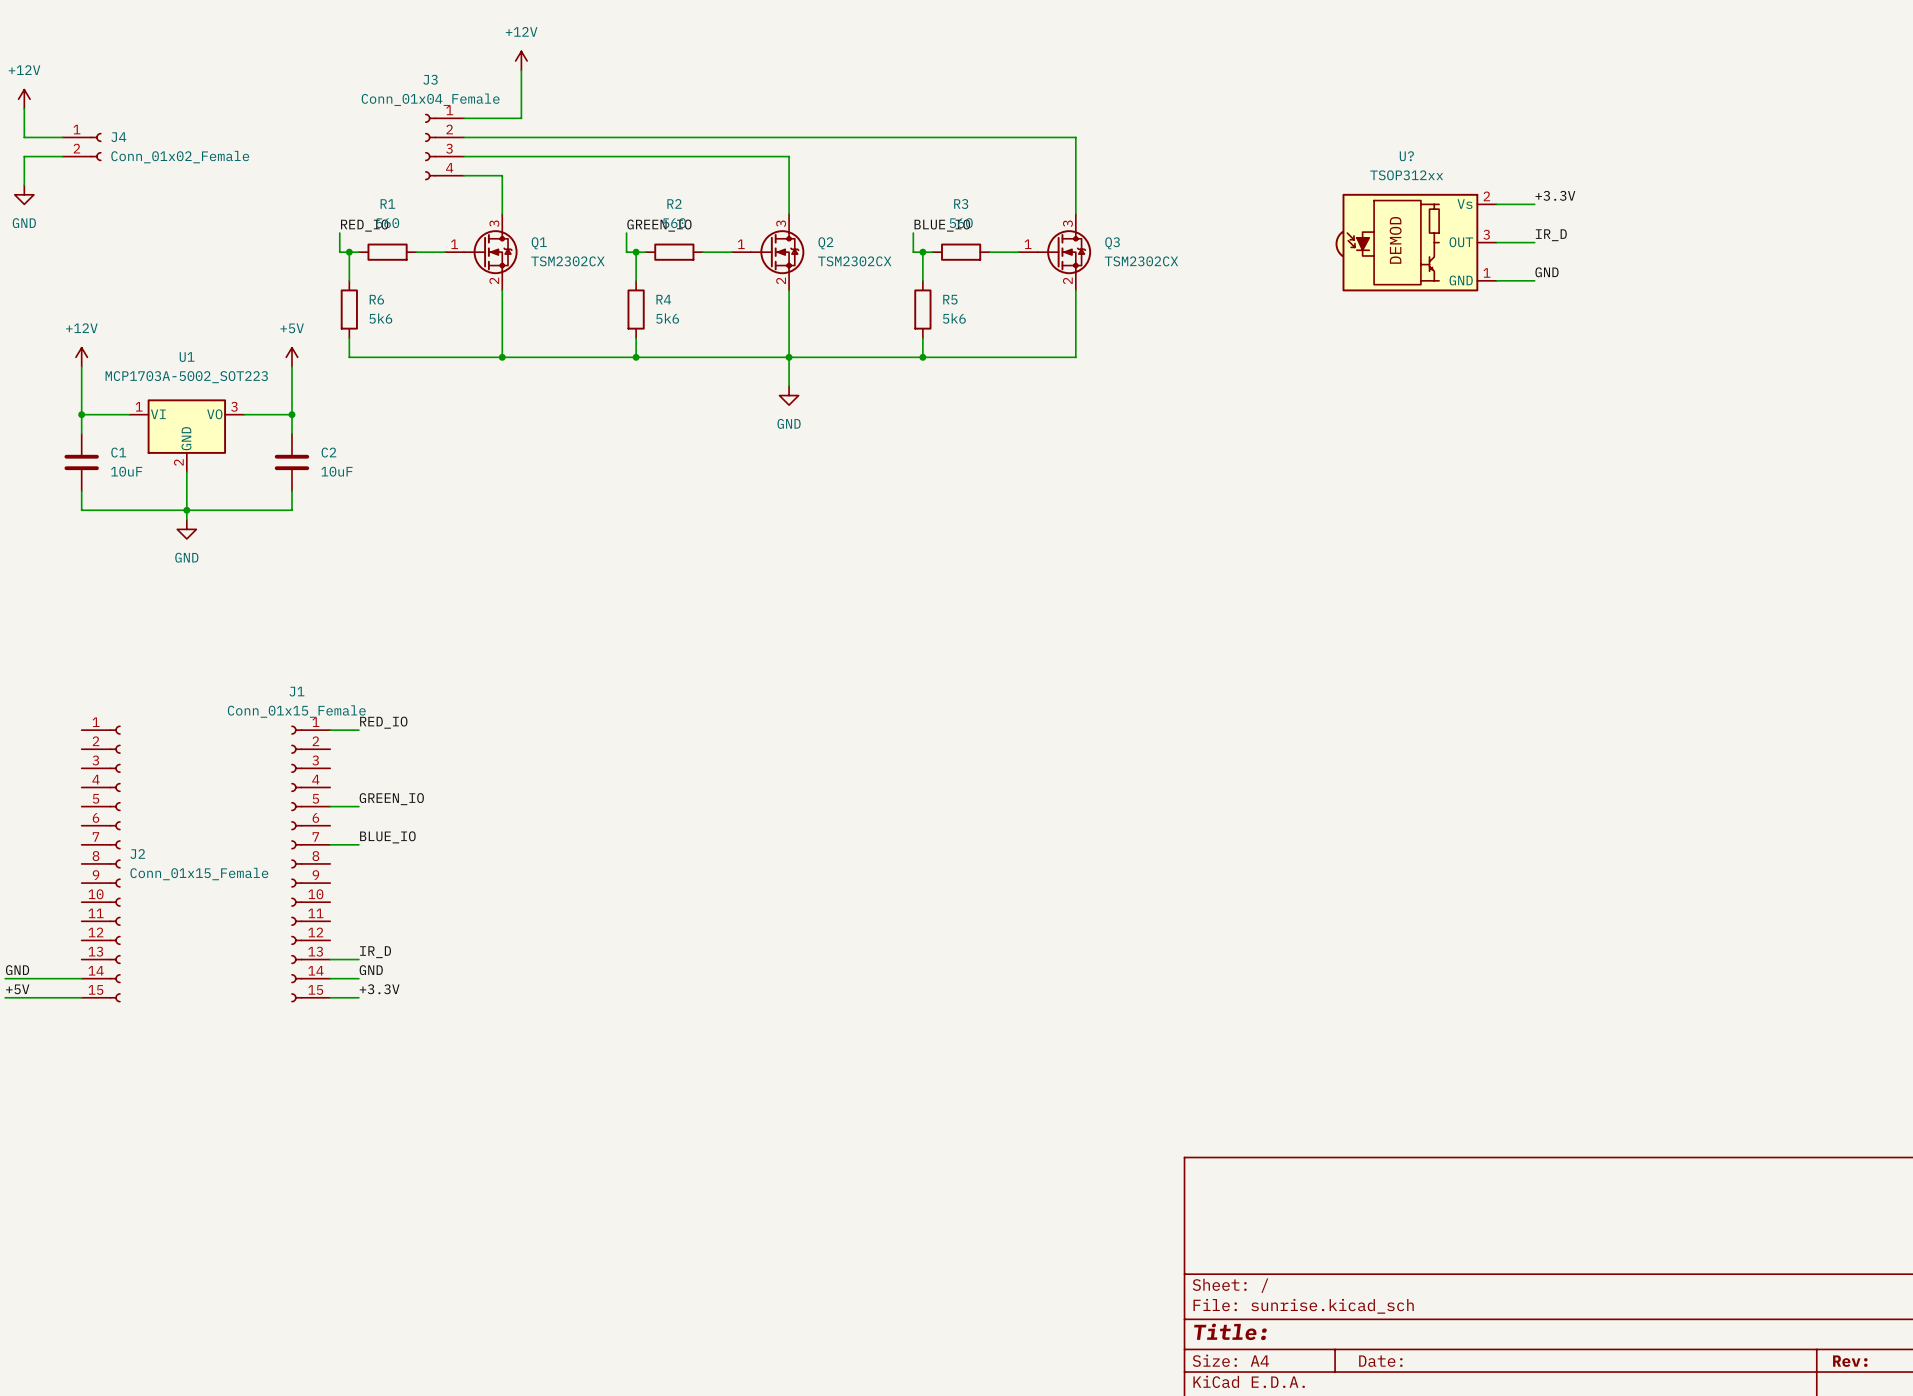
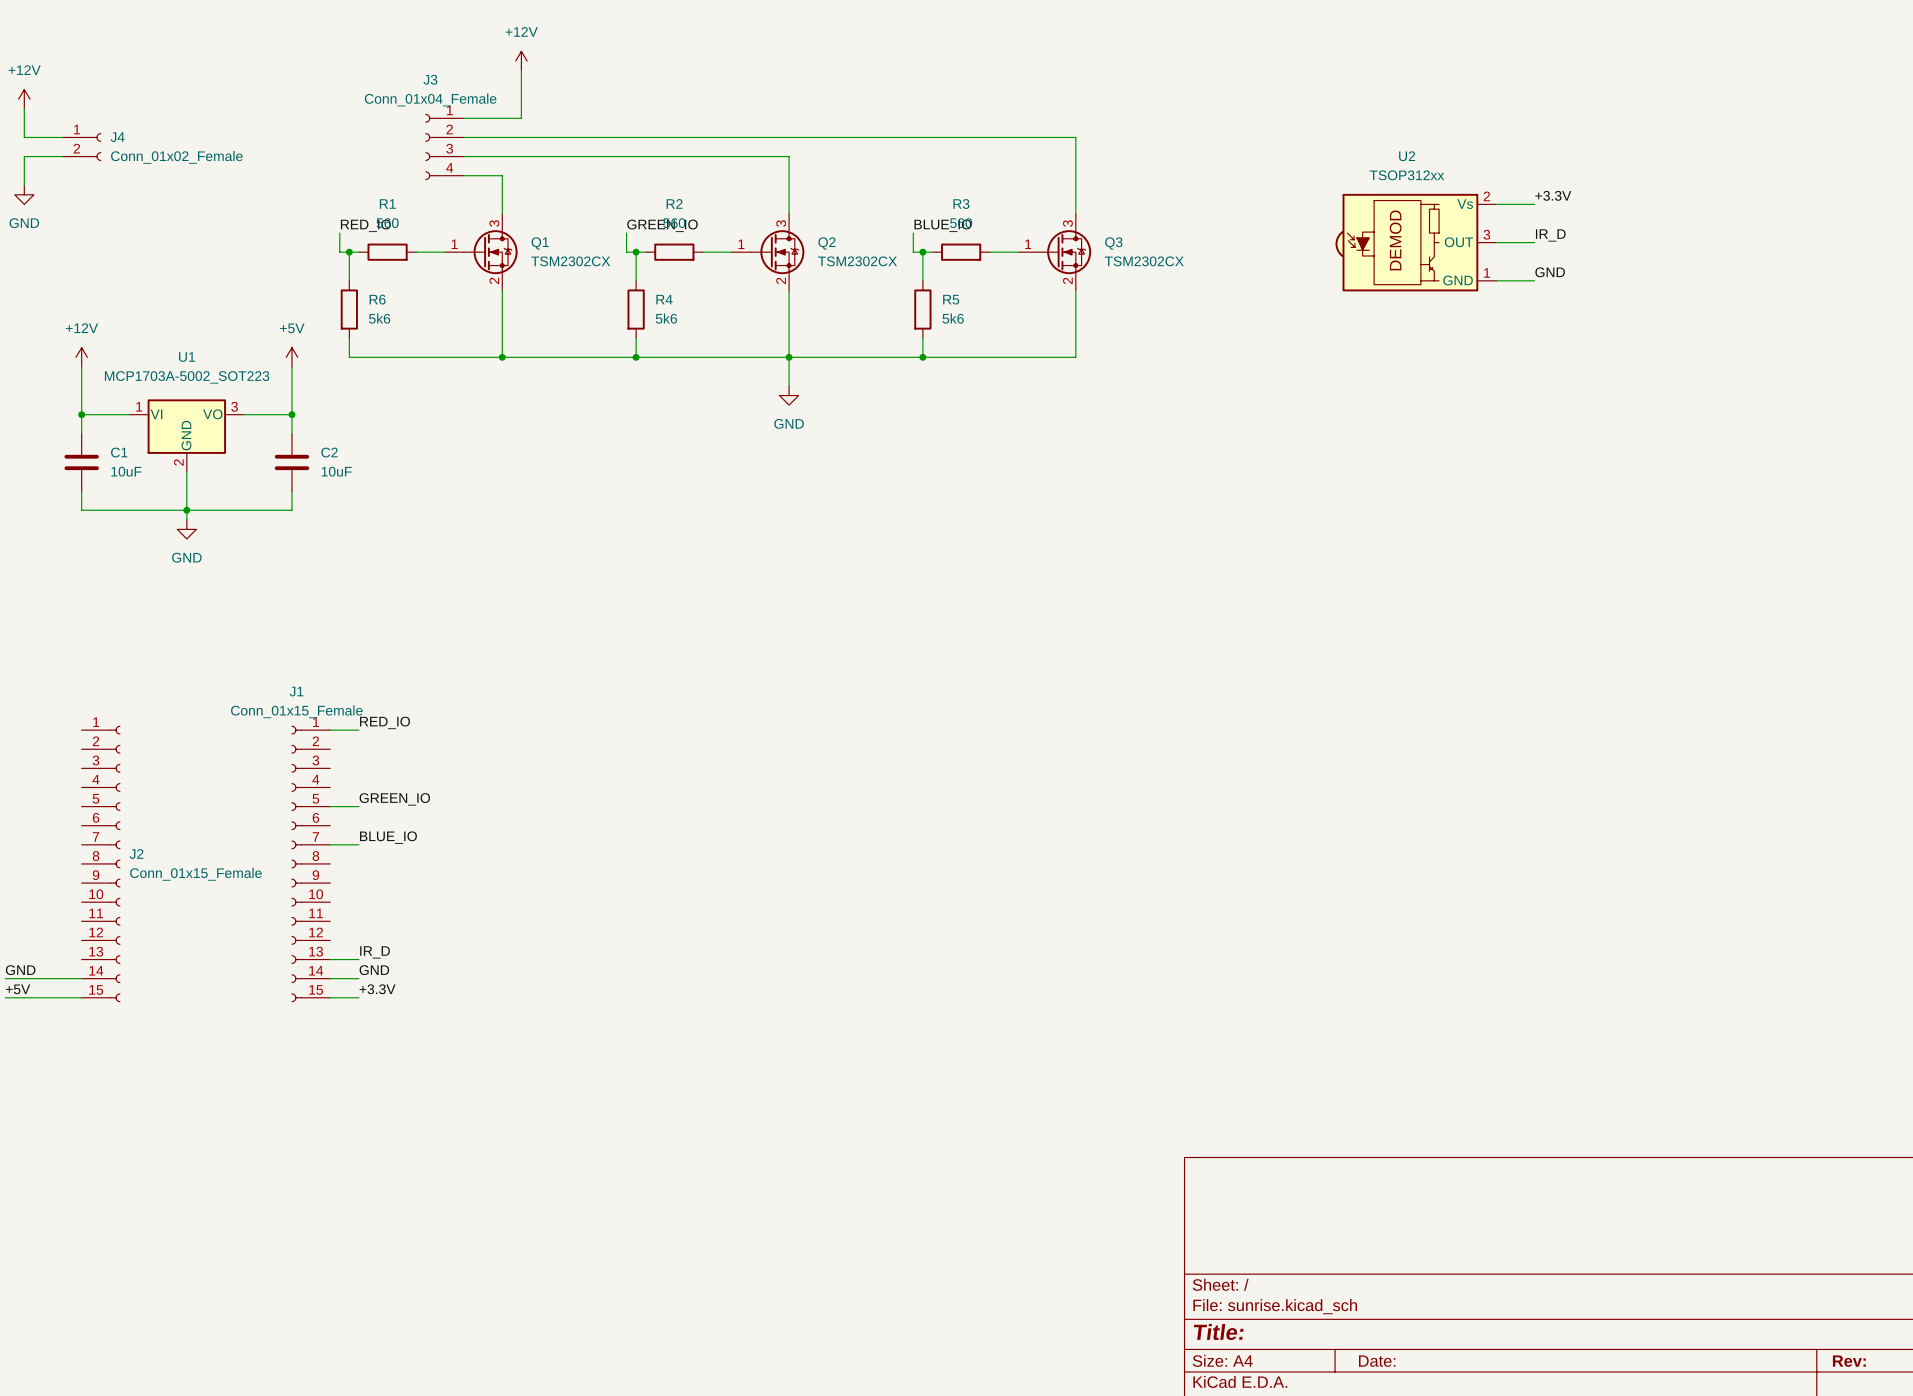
U? name: U? (1406, 156) -> U2 (1407, 156)

